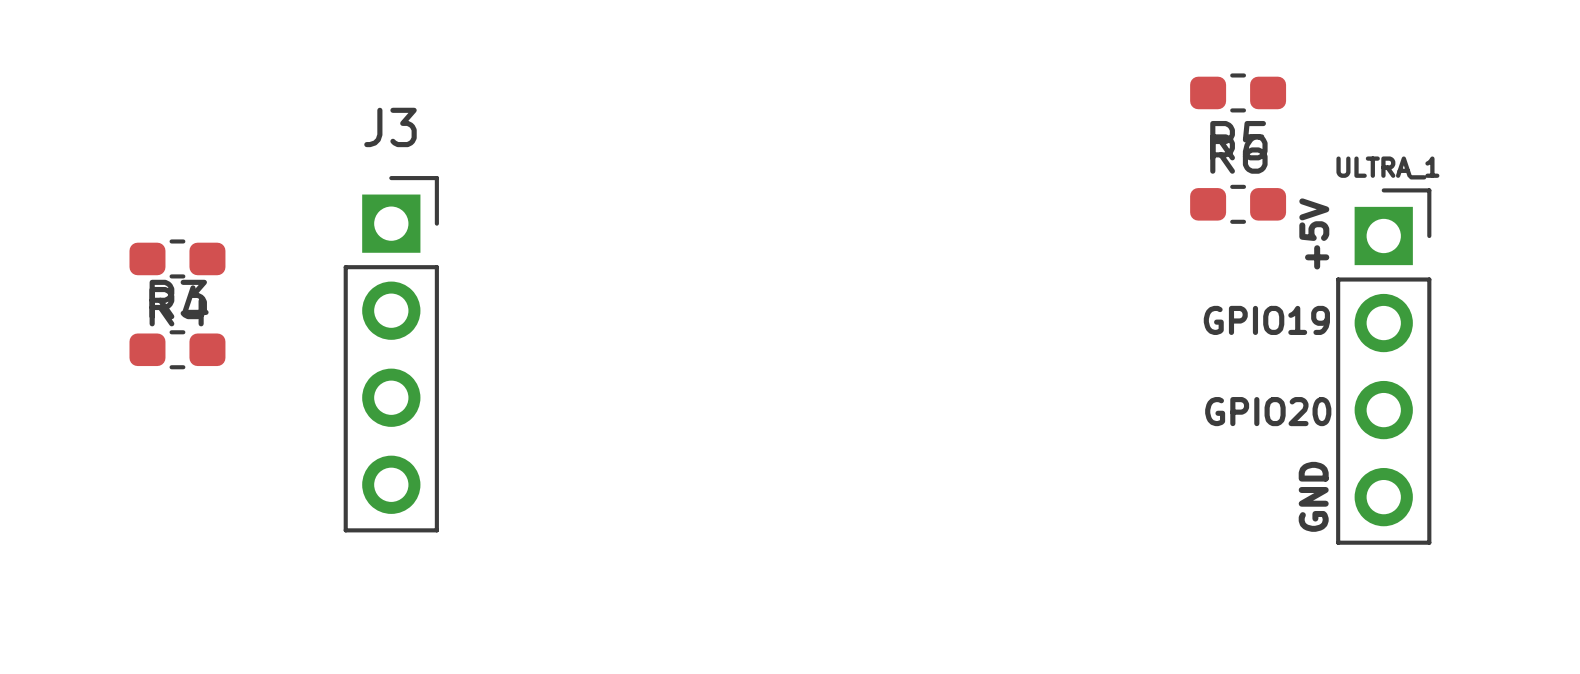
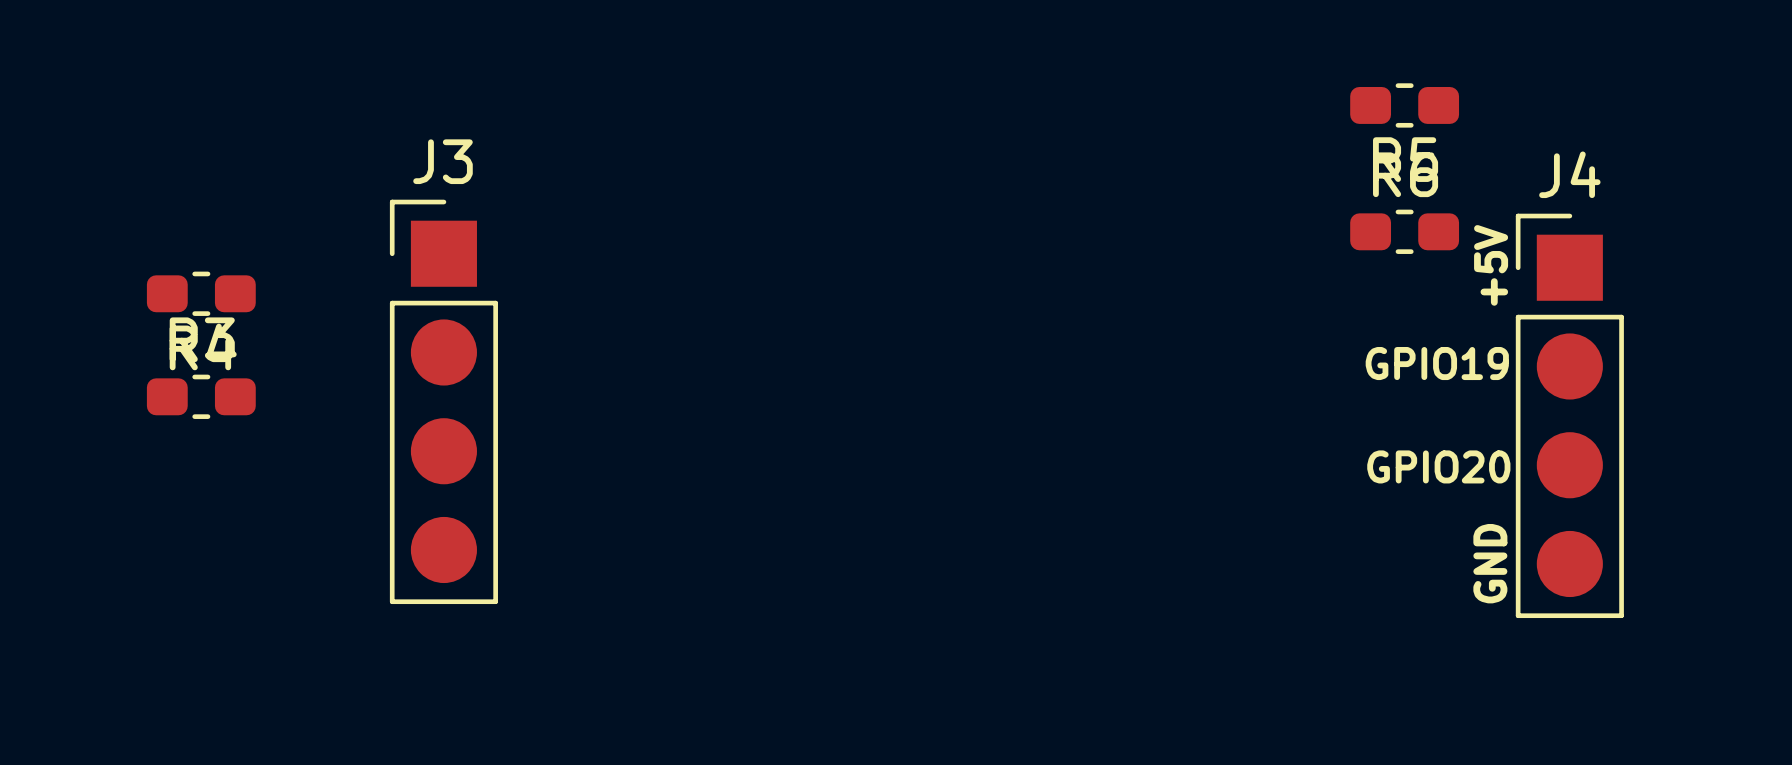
J3 footprint: [343, 176, 439, 533] -> [389, 199, 498, 605]
part: ULTRA_1 (1383, 366) -> none
J4: none -> (1569, 415)

